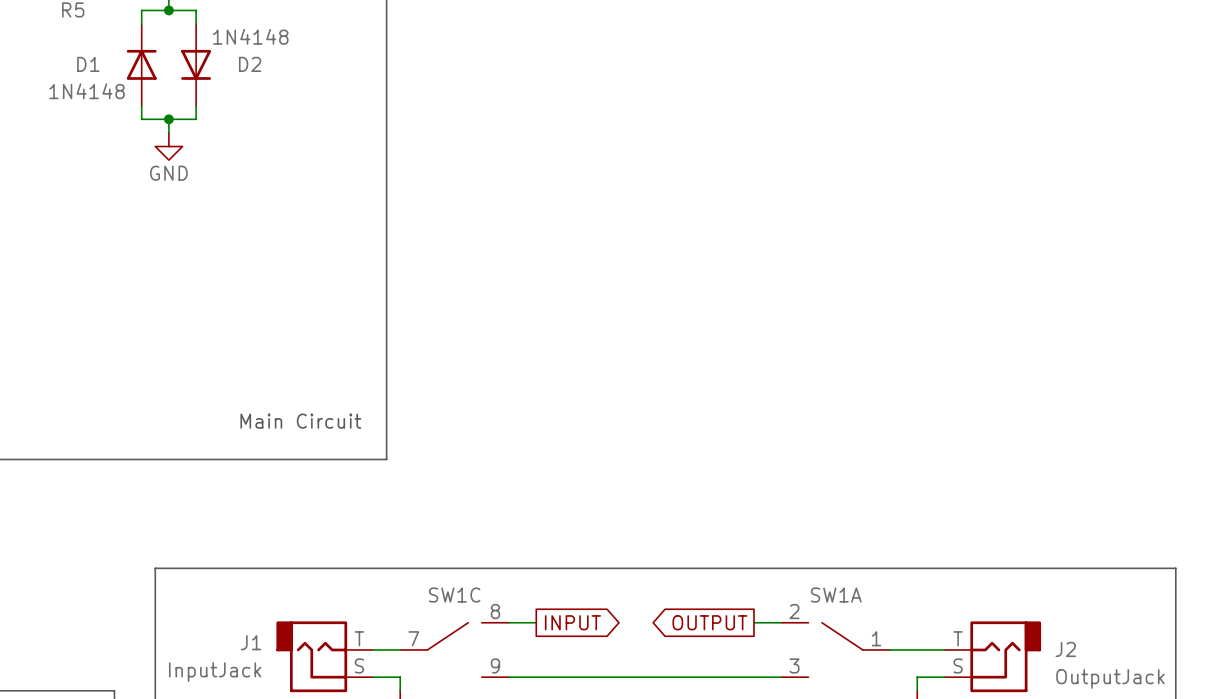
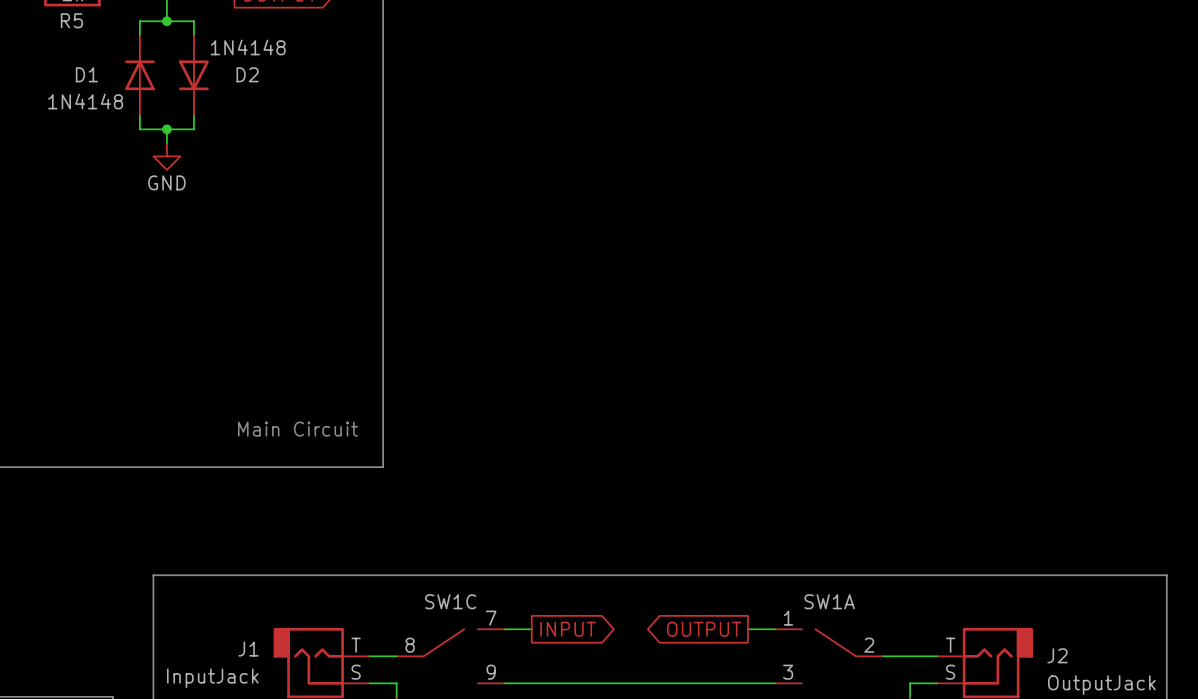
SW1C pin number: 8 (495, 611) -> 7 (491, 618)
SW1A pin number: 2 (794, 611) -> 1 (788, 618)
SW1C pin number: 7 (413, 638) -> 8 (410, 645)
SW1A pin number: 1 (876, 638) -> 2 (869, 645)

